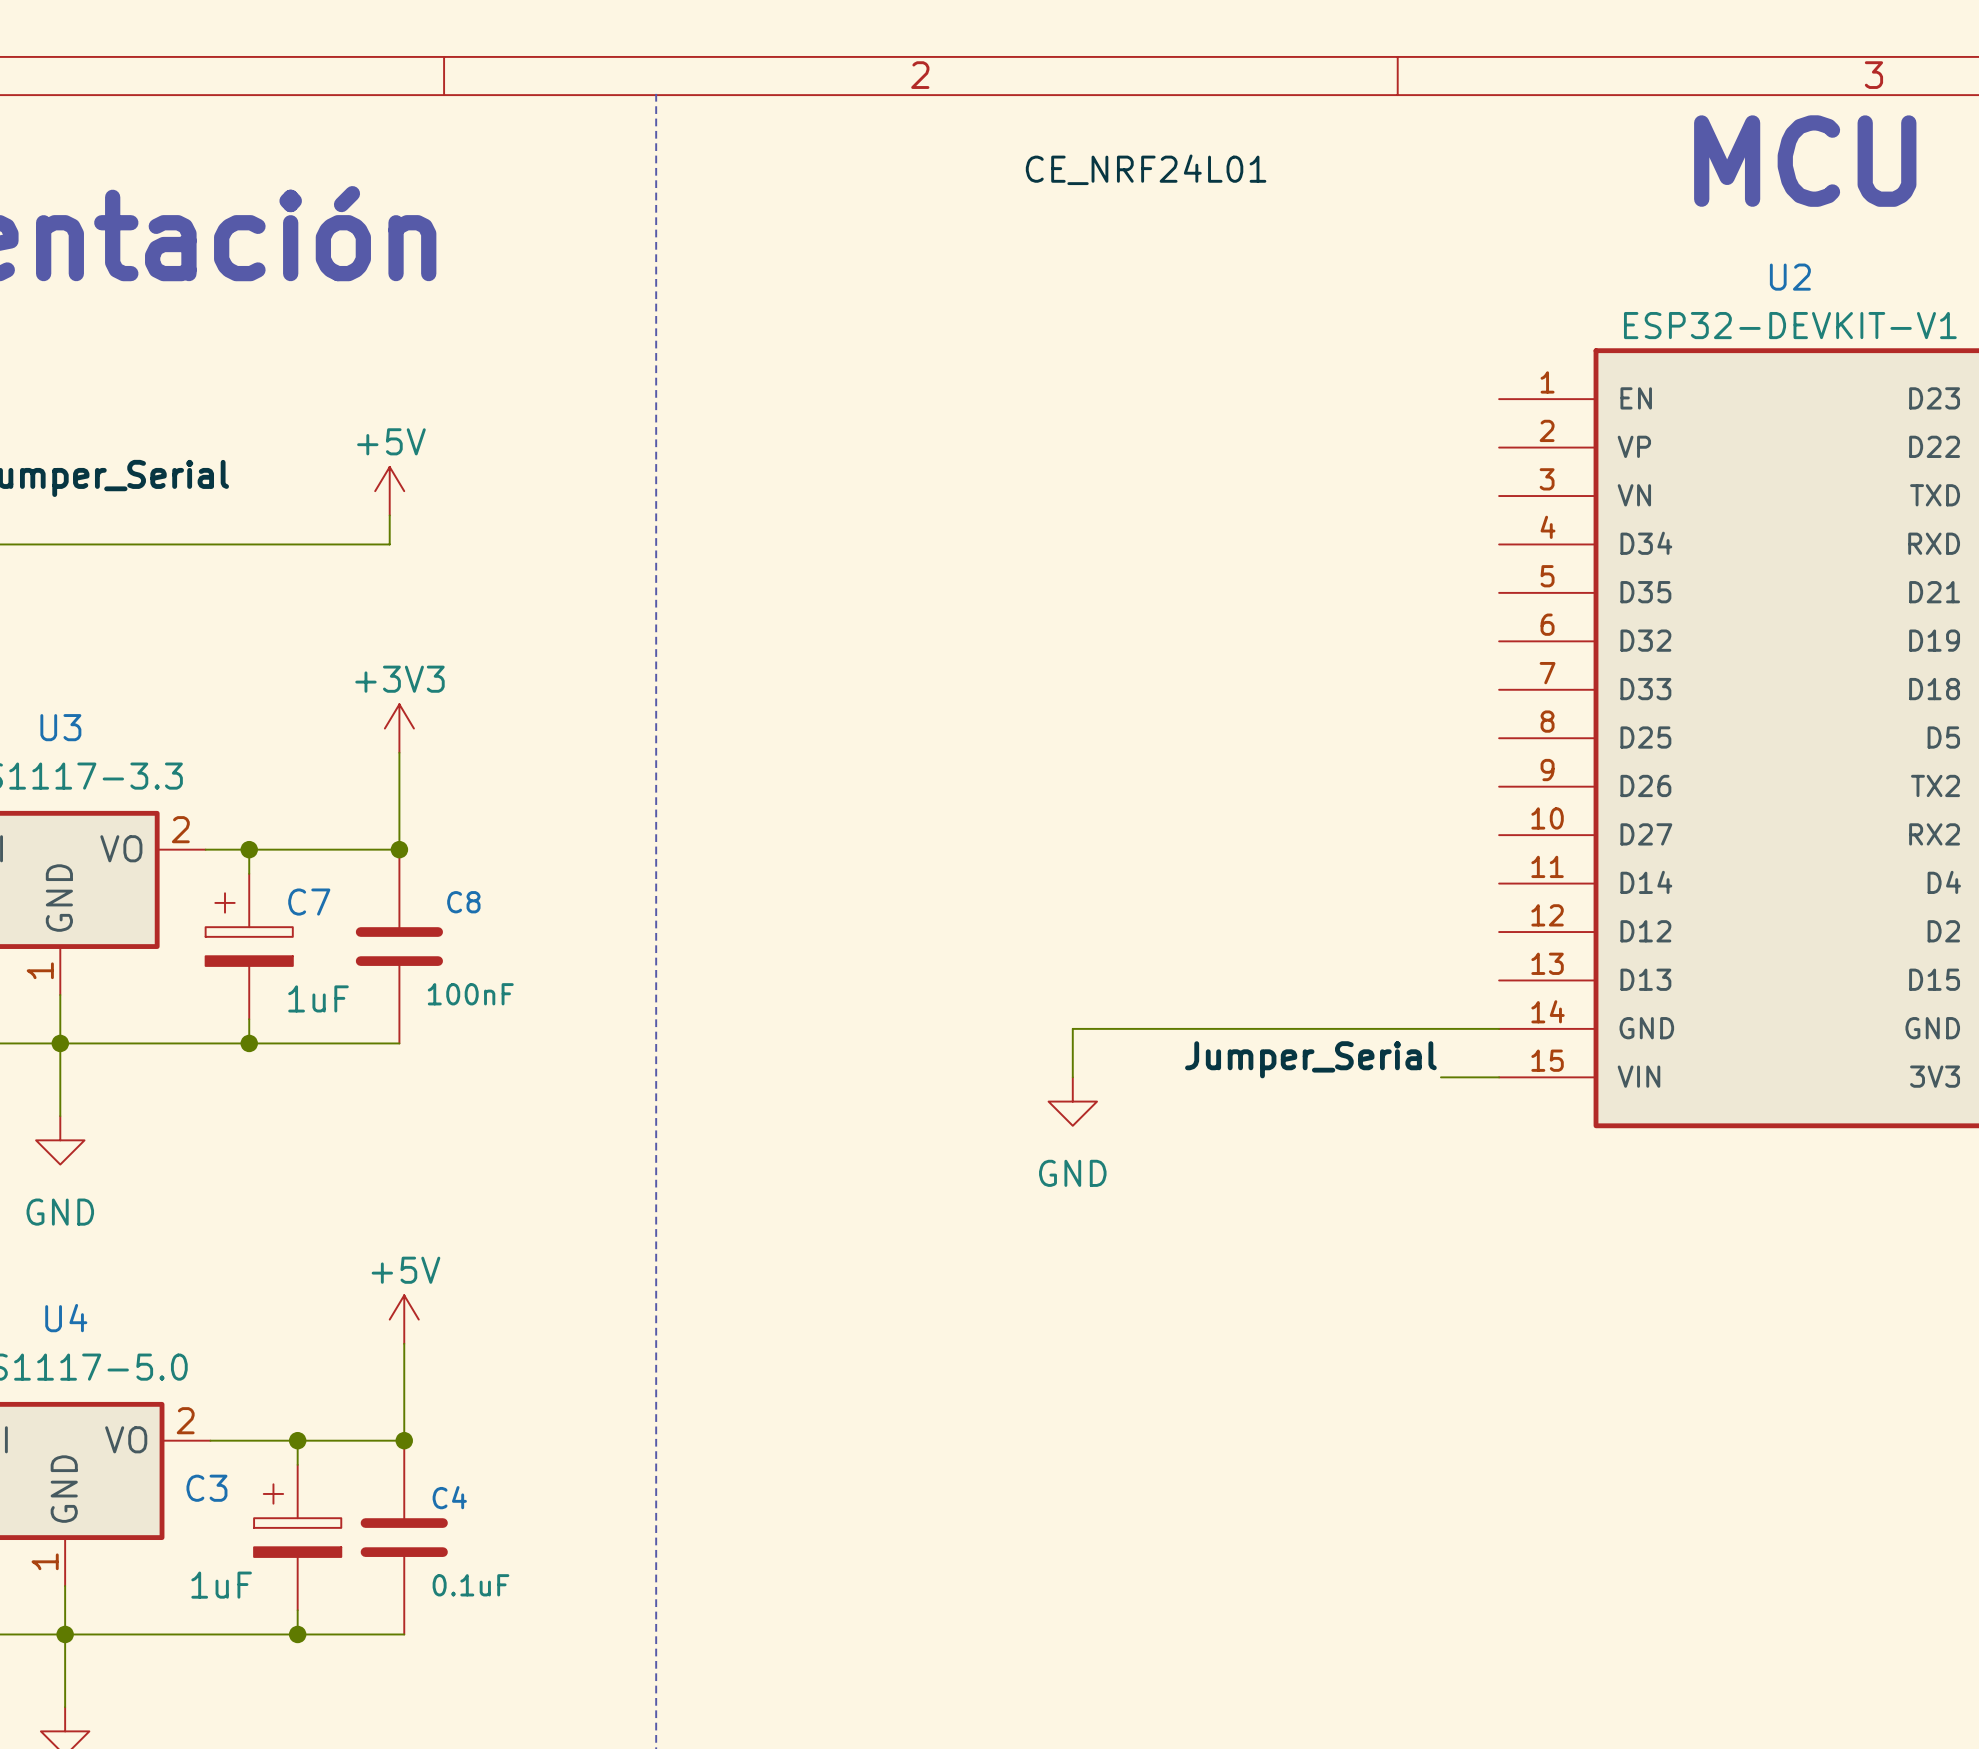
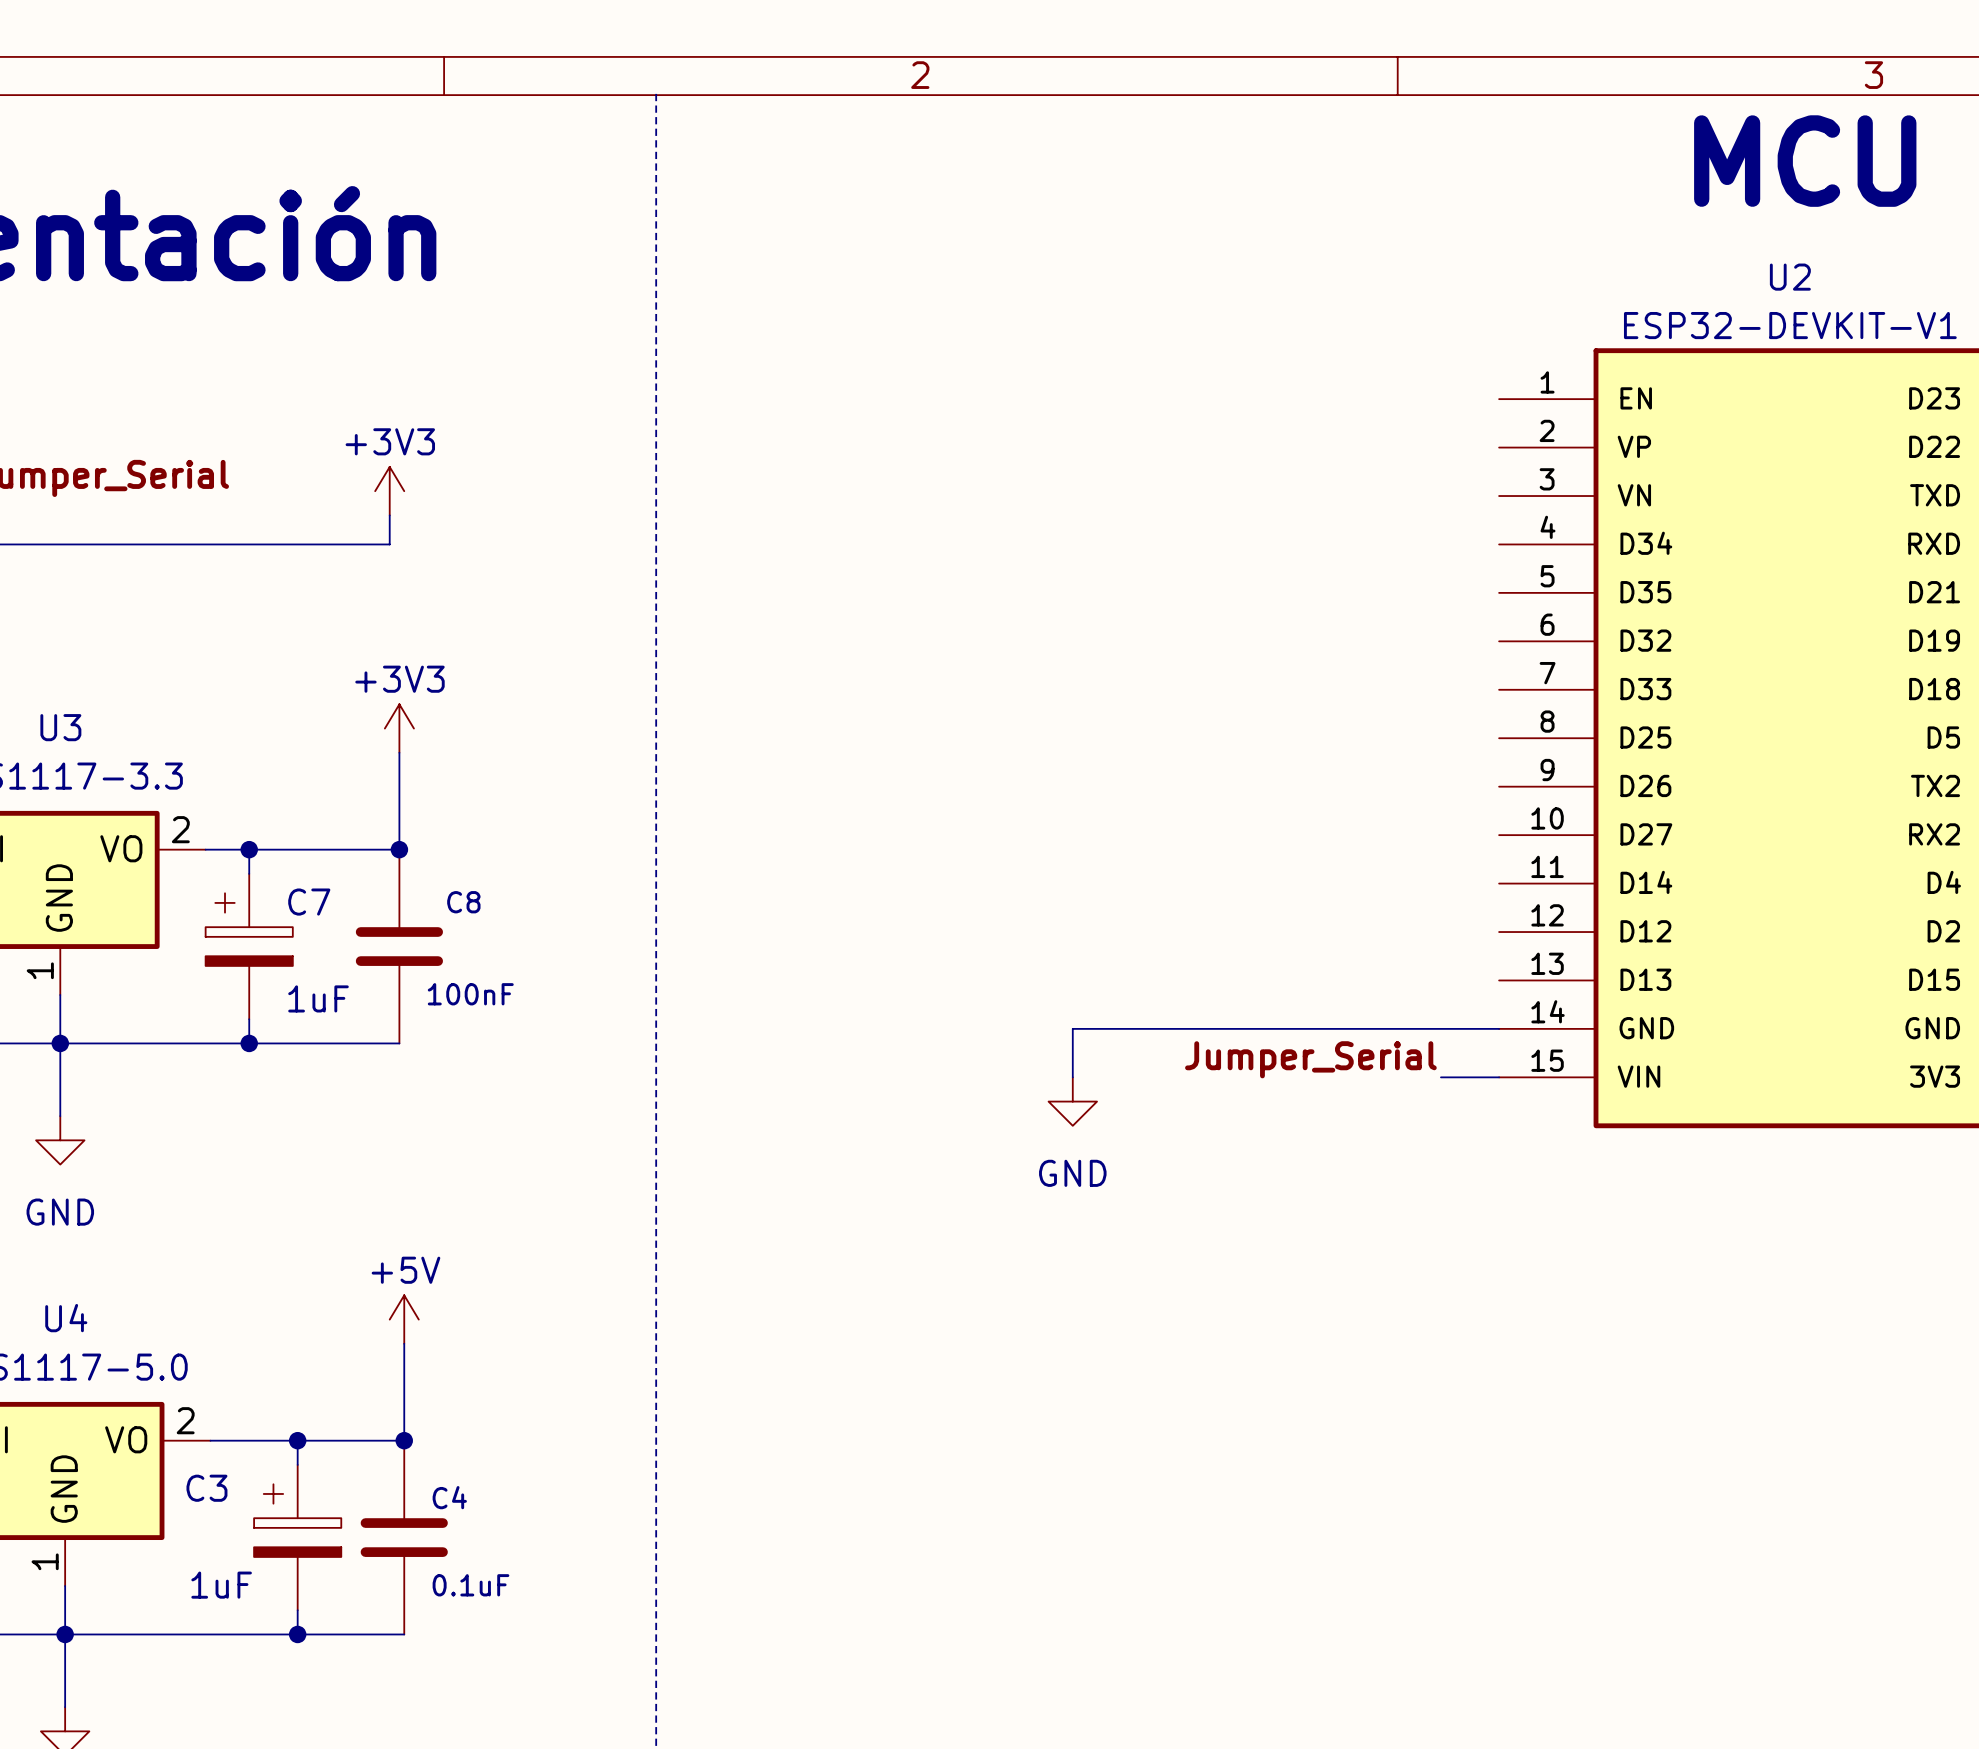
label: CE_NRF24L01 (1146, 169) -> none
power symbol: +5V (389, 491) -> +3V3 (389, 491)

